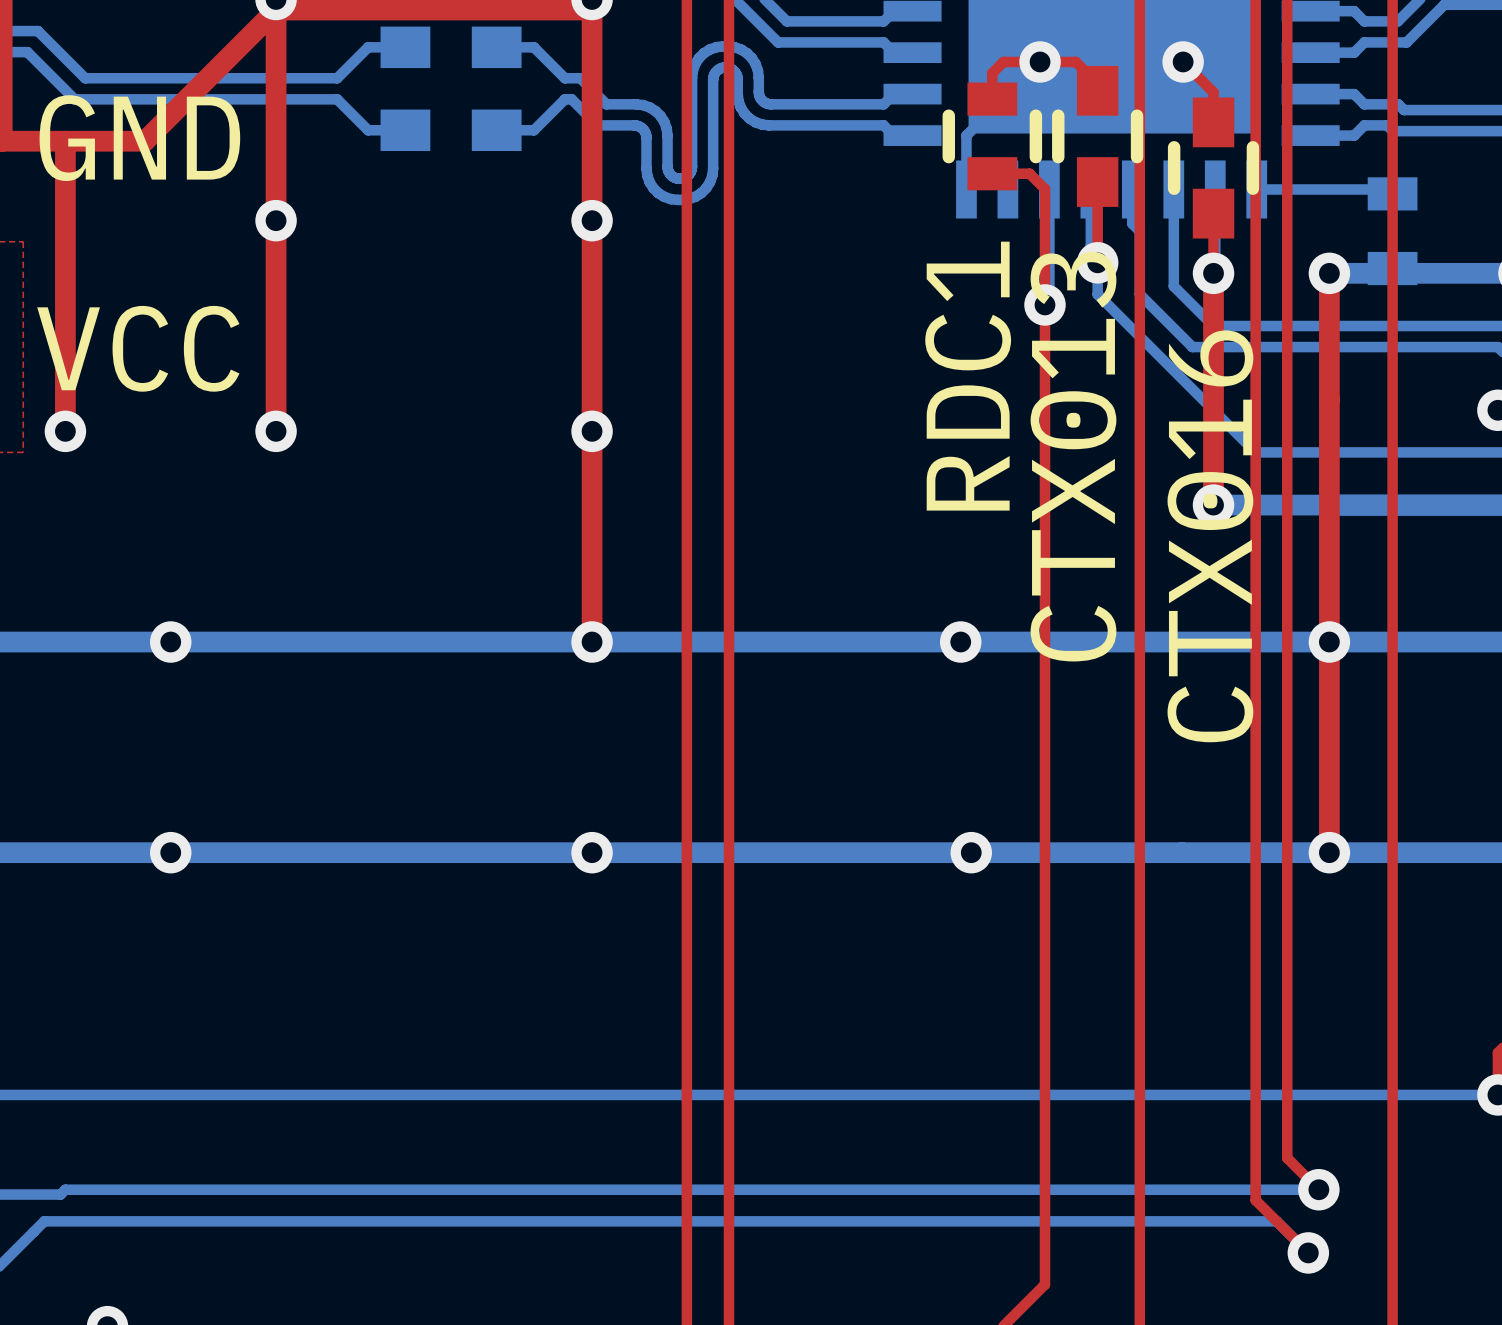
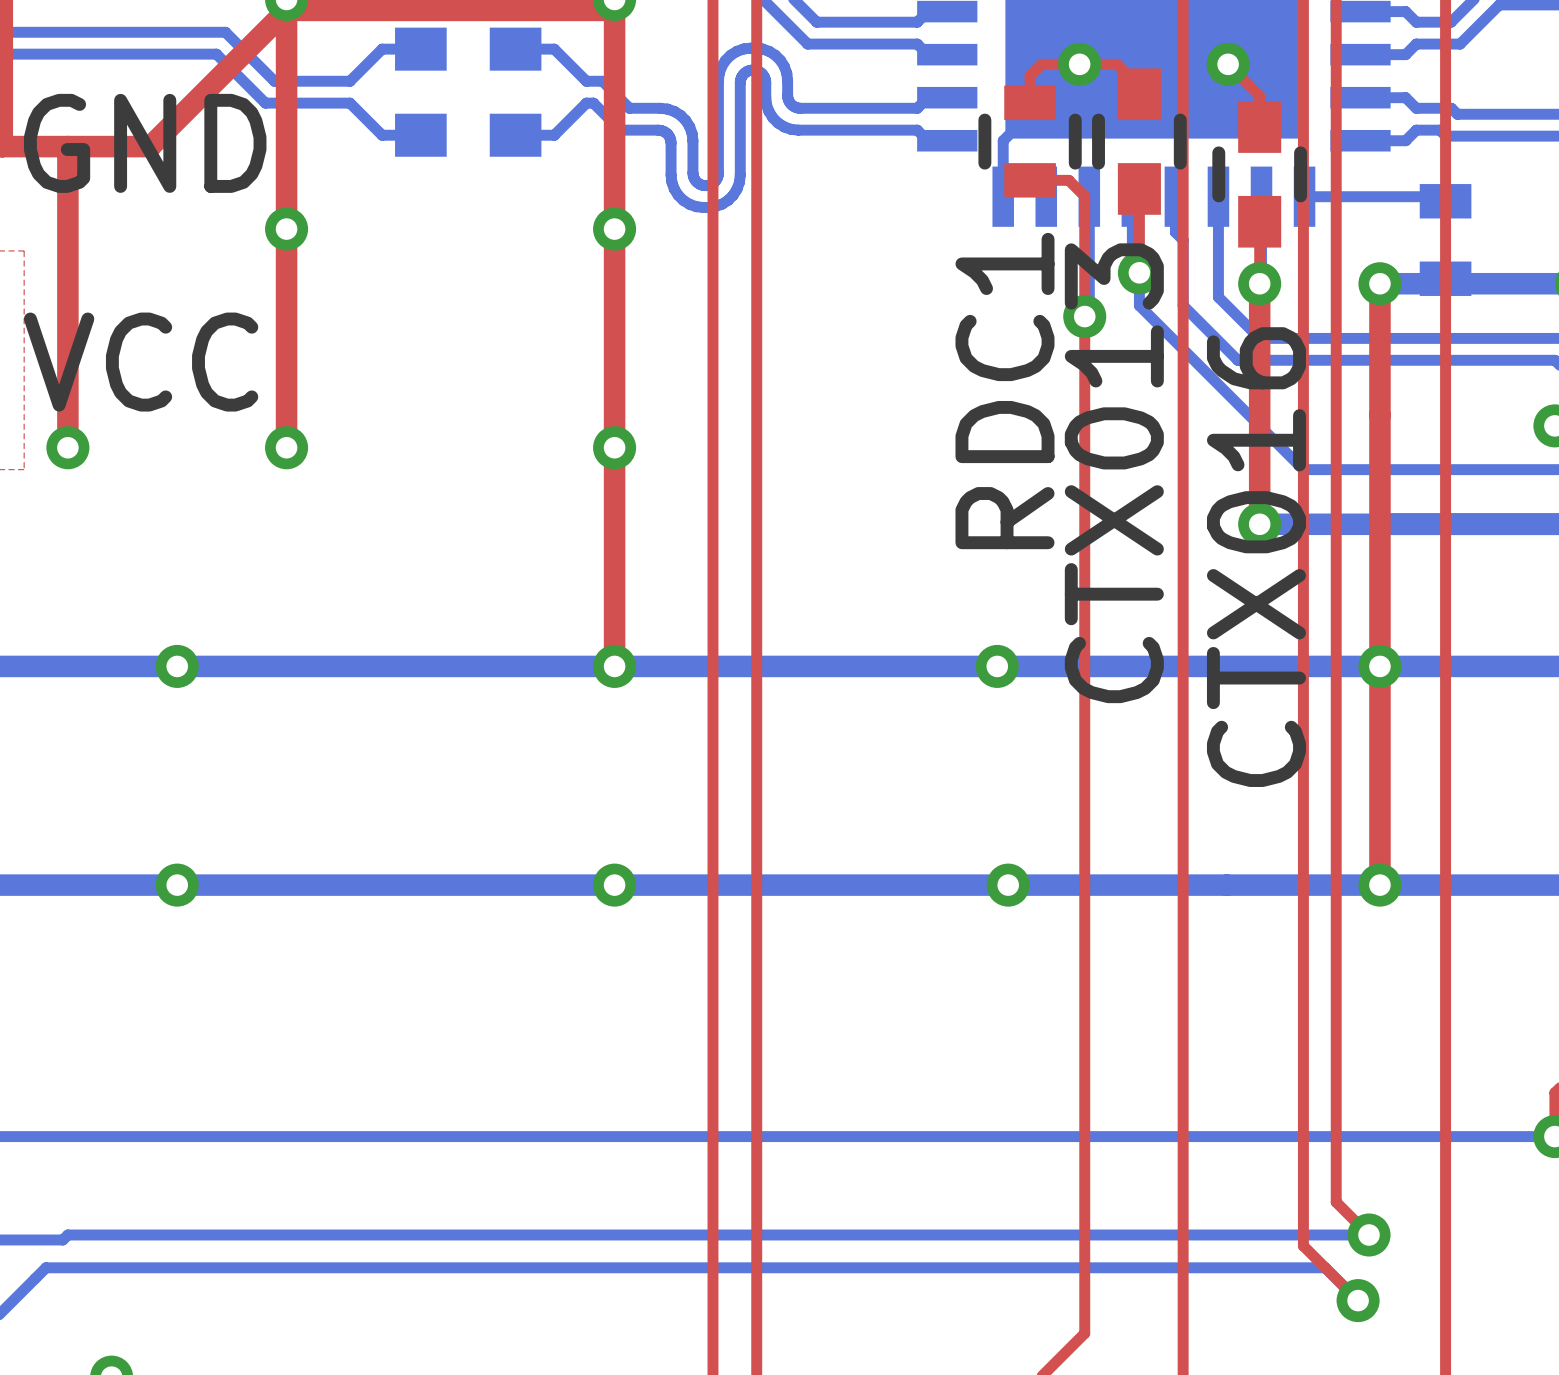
bottom track: (38, 31) (85, 78) (264, 78) -> (39, 32) (225, 32) (274, 81)
bottom track: (27, 52) (74, 99) (255, 99) -> (28, 54) (216, 54) (265, 103)

